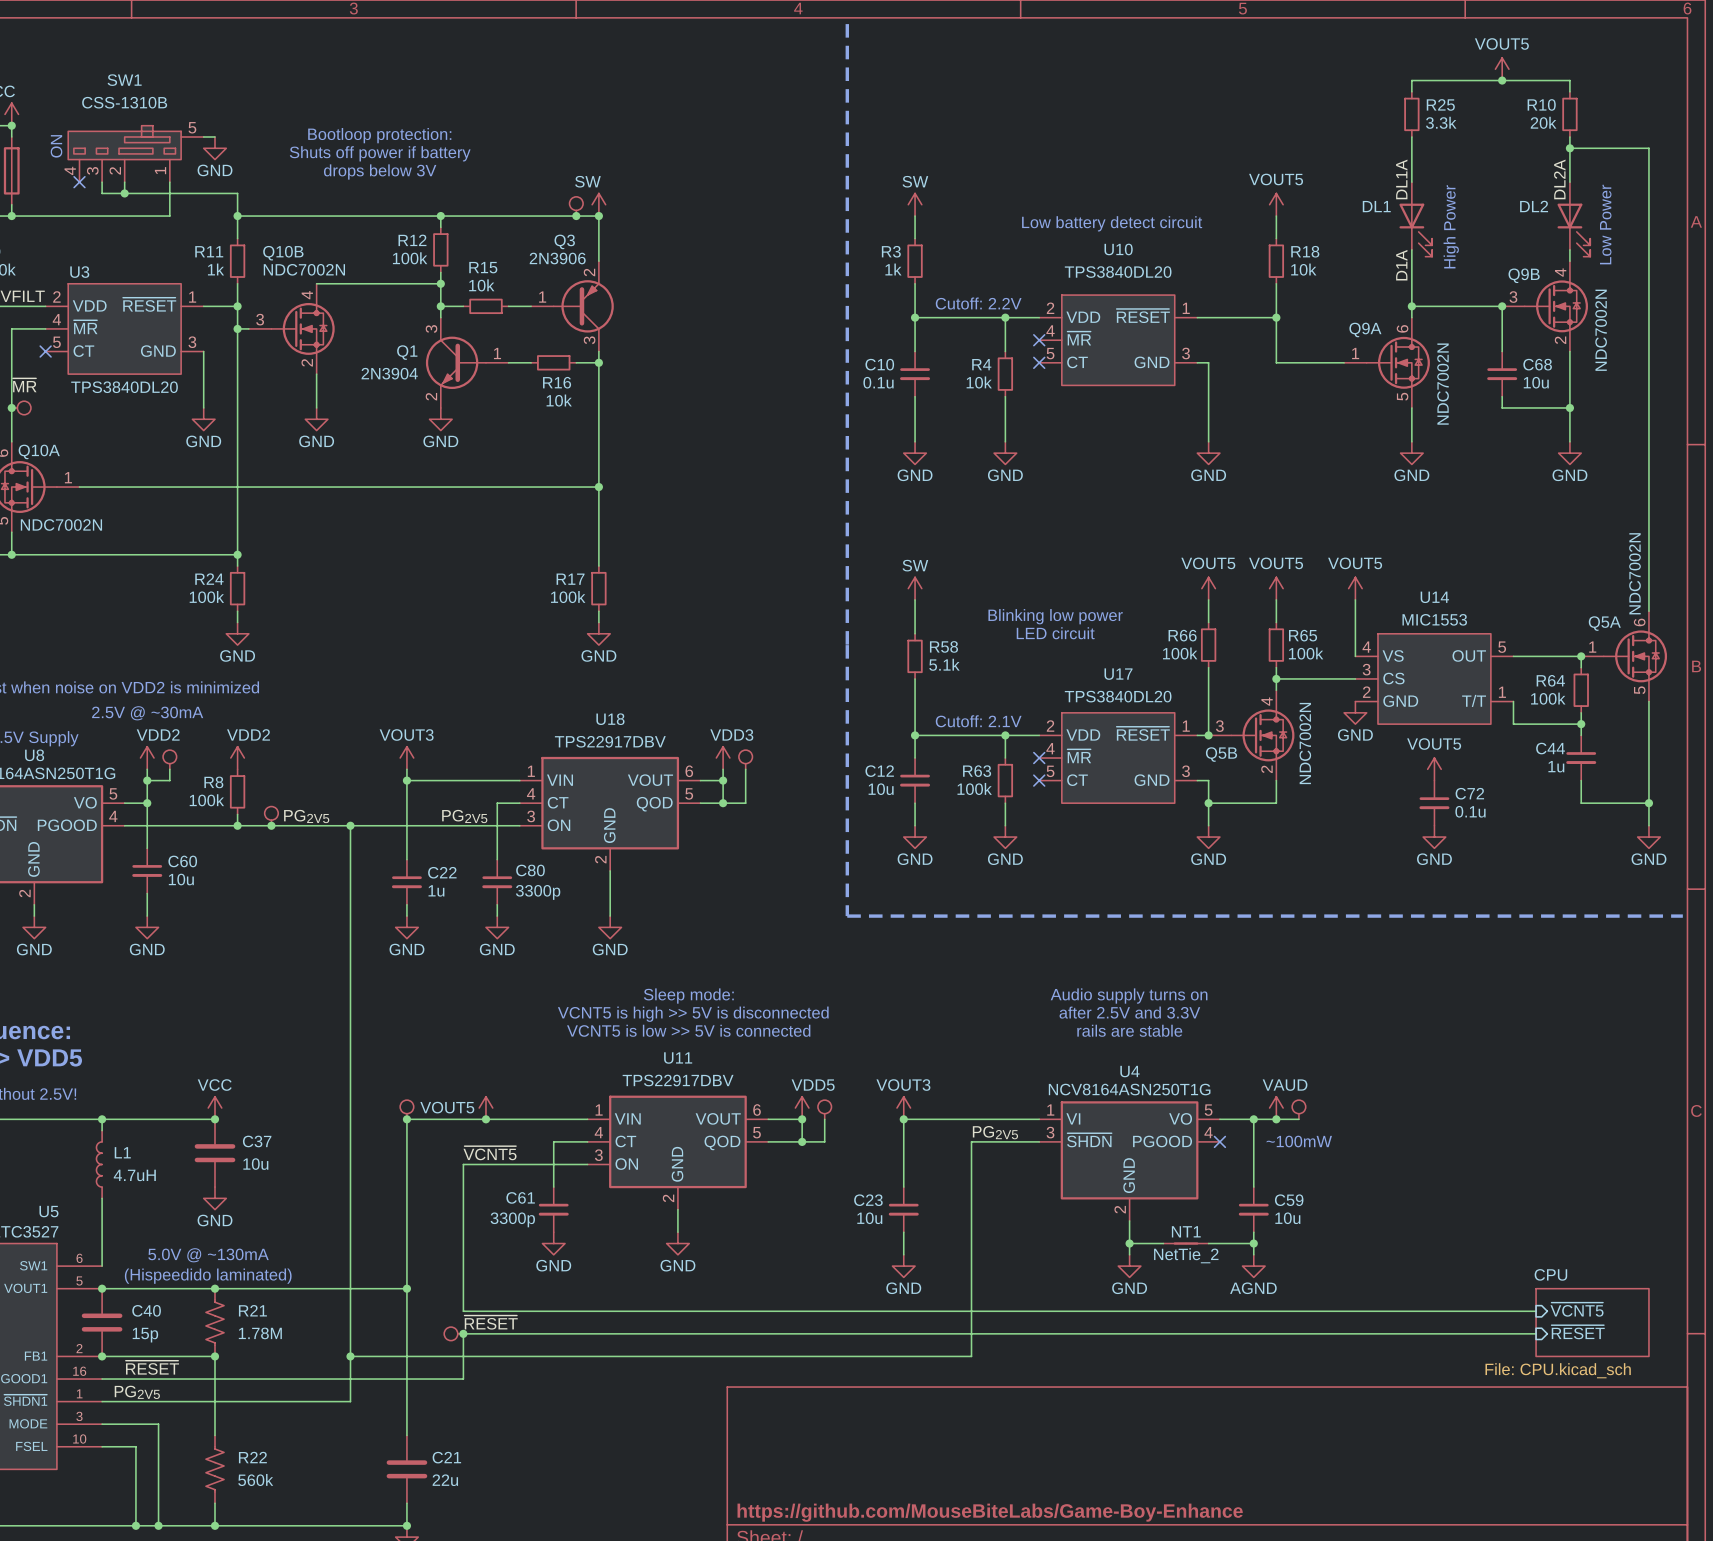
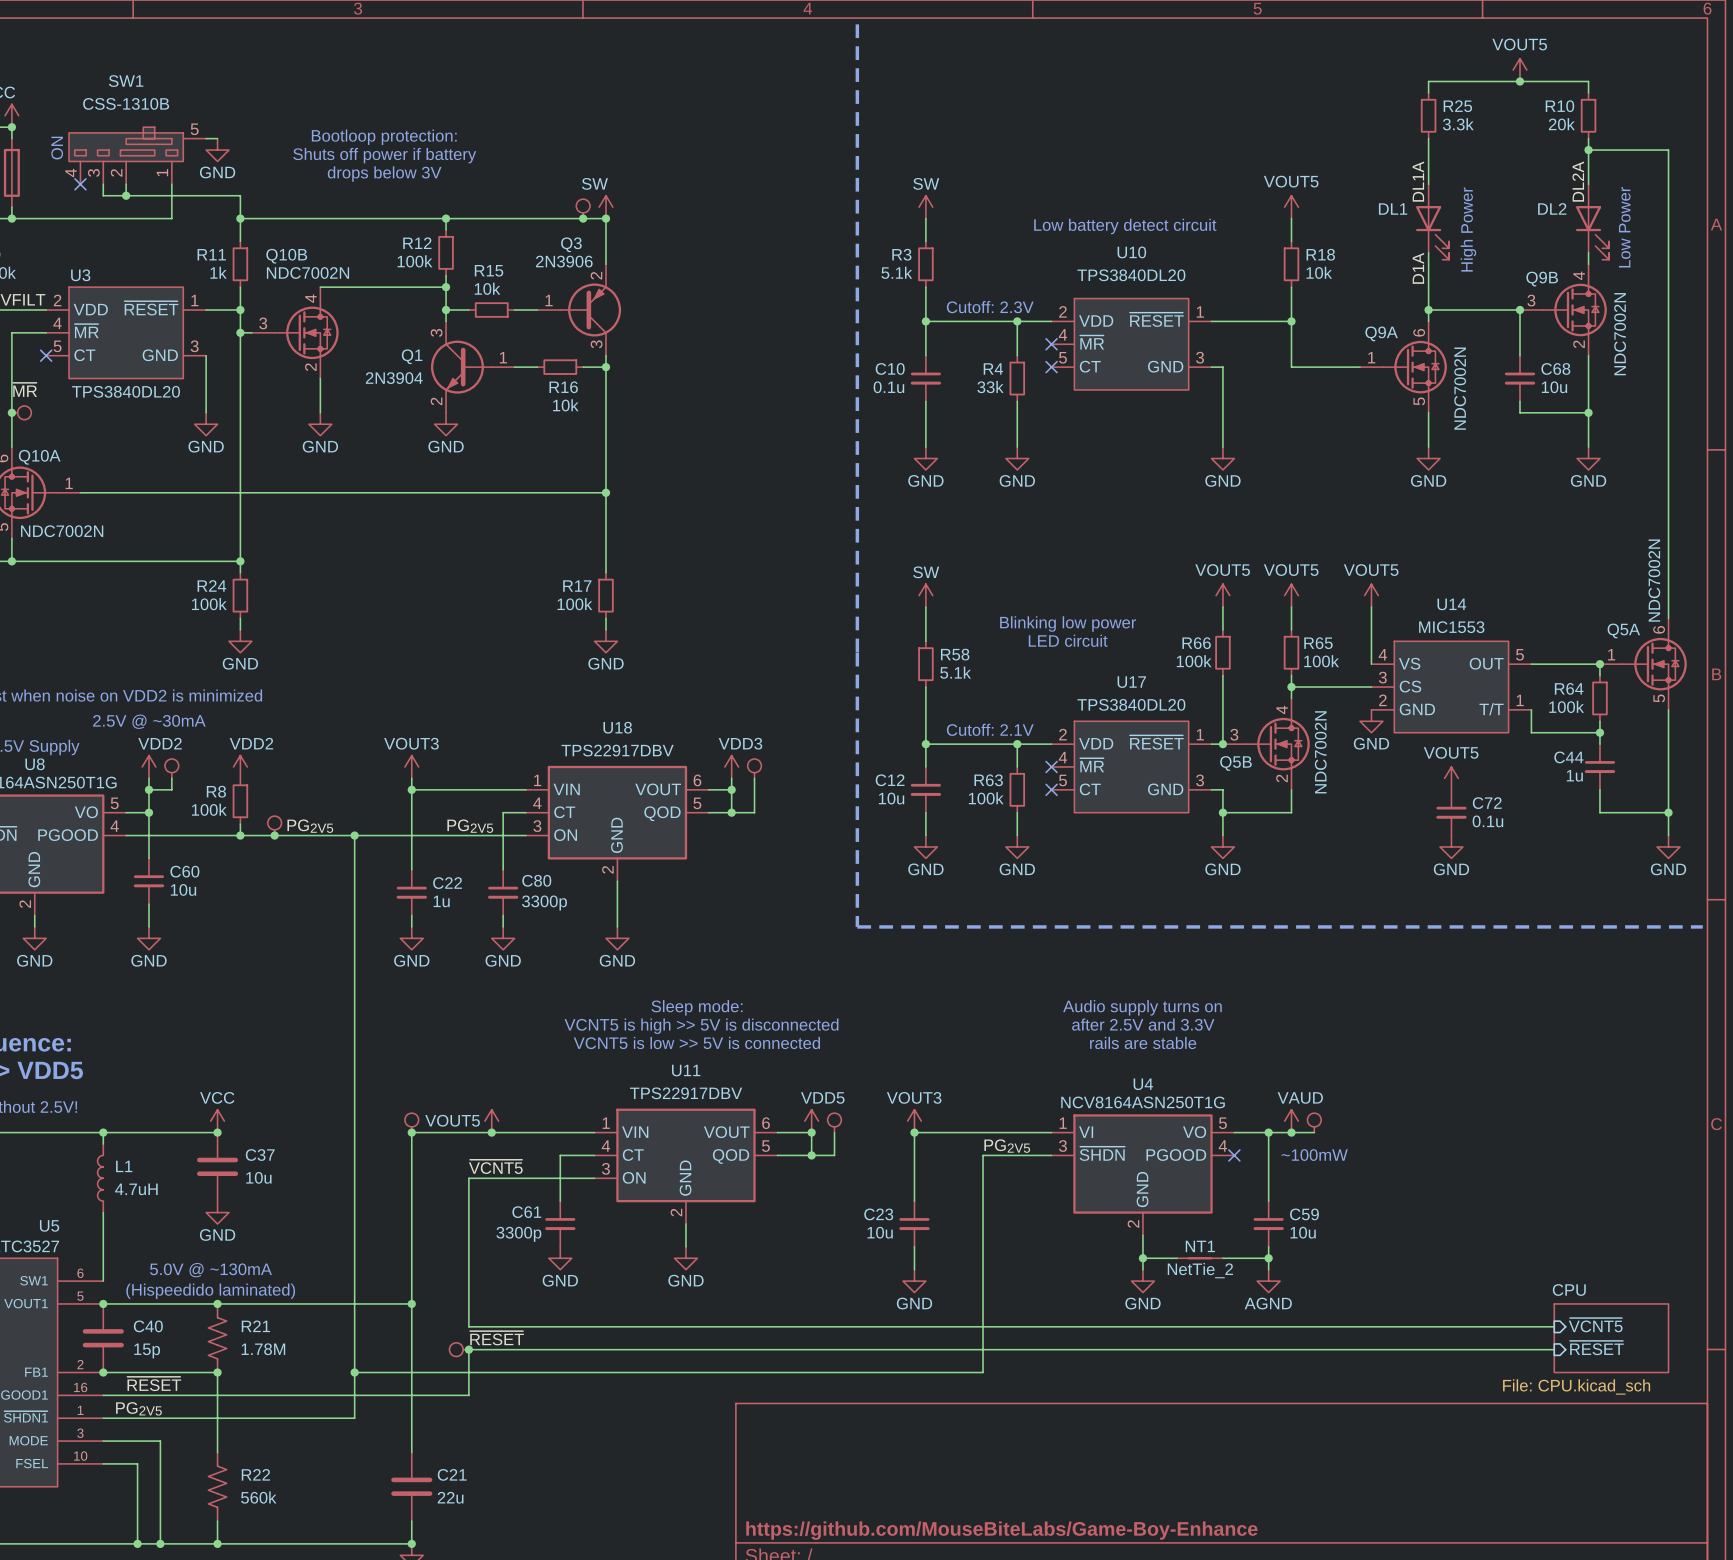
R3 value: 1k (893, 269) -> 5.1k (896, 272)
text: Cutoff: 2.2V (978, 303) -> Cutoff: 2.3V (990, 307)
R4 value: 10k (979, 382) -> 33k (990, 387)

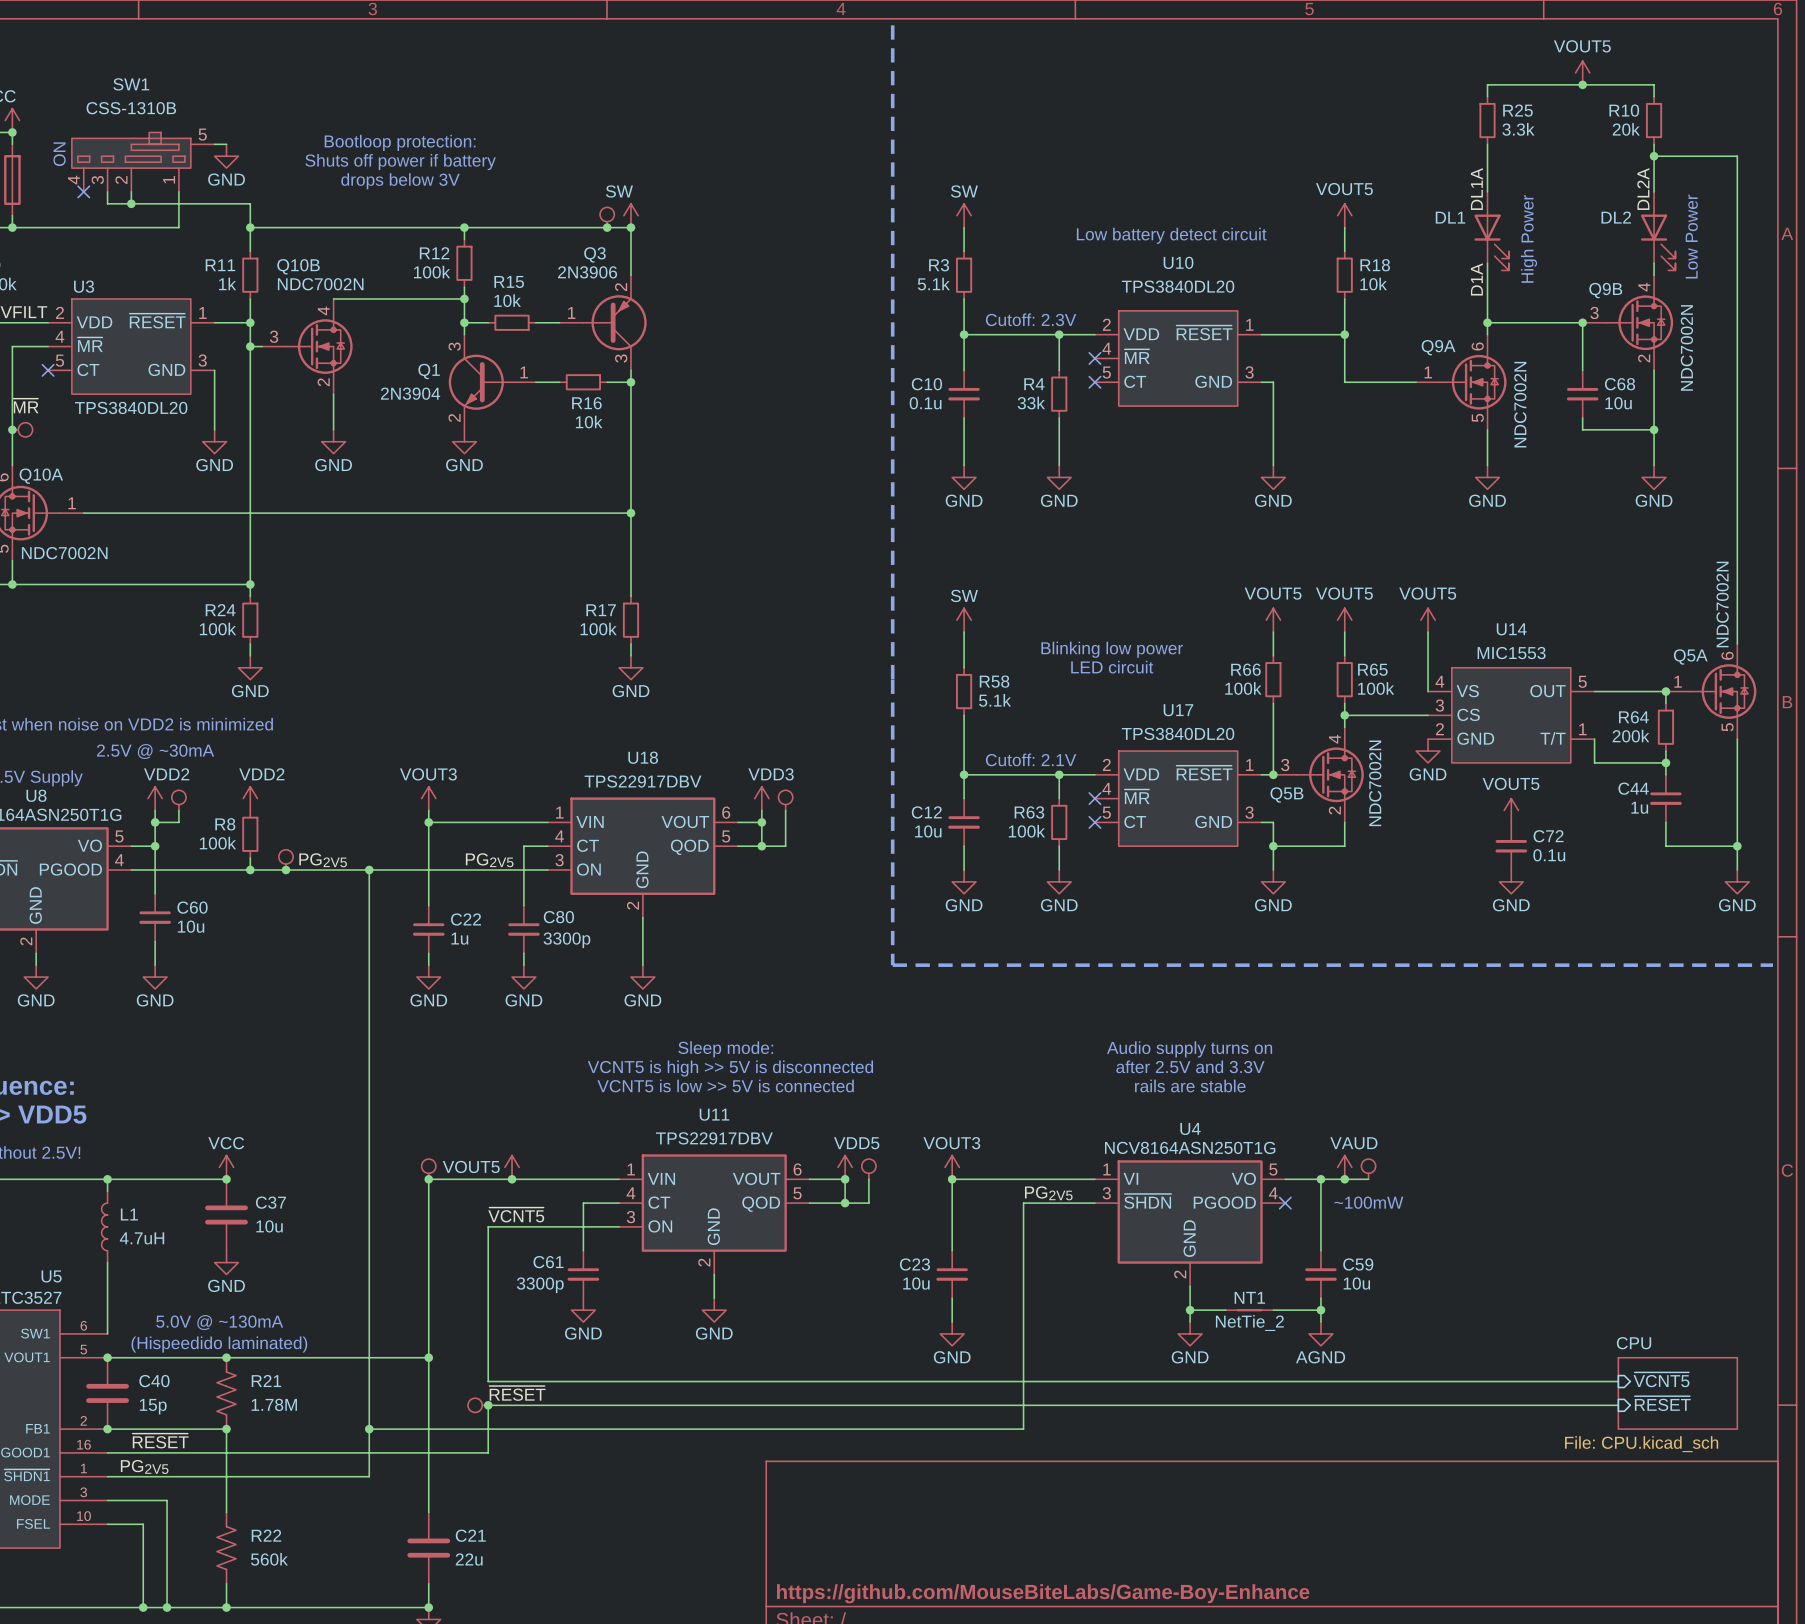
R64 value: 100k (1566, 706) -> 200k (1630, 736)

